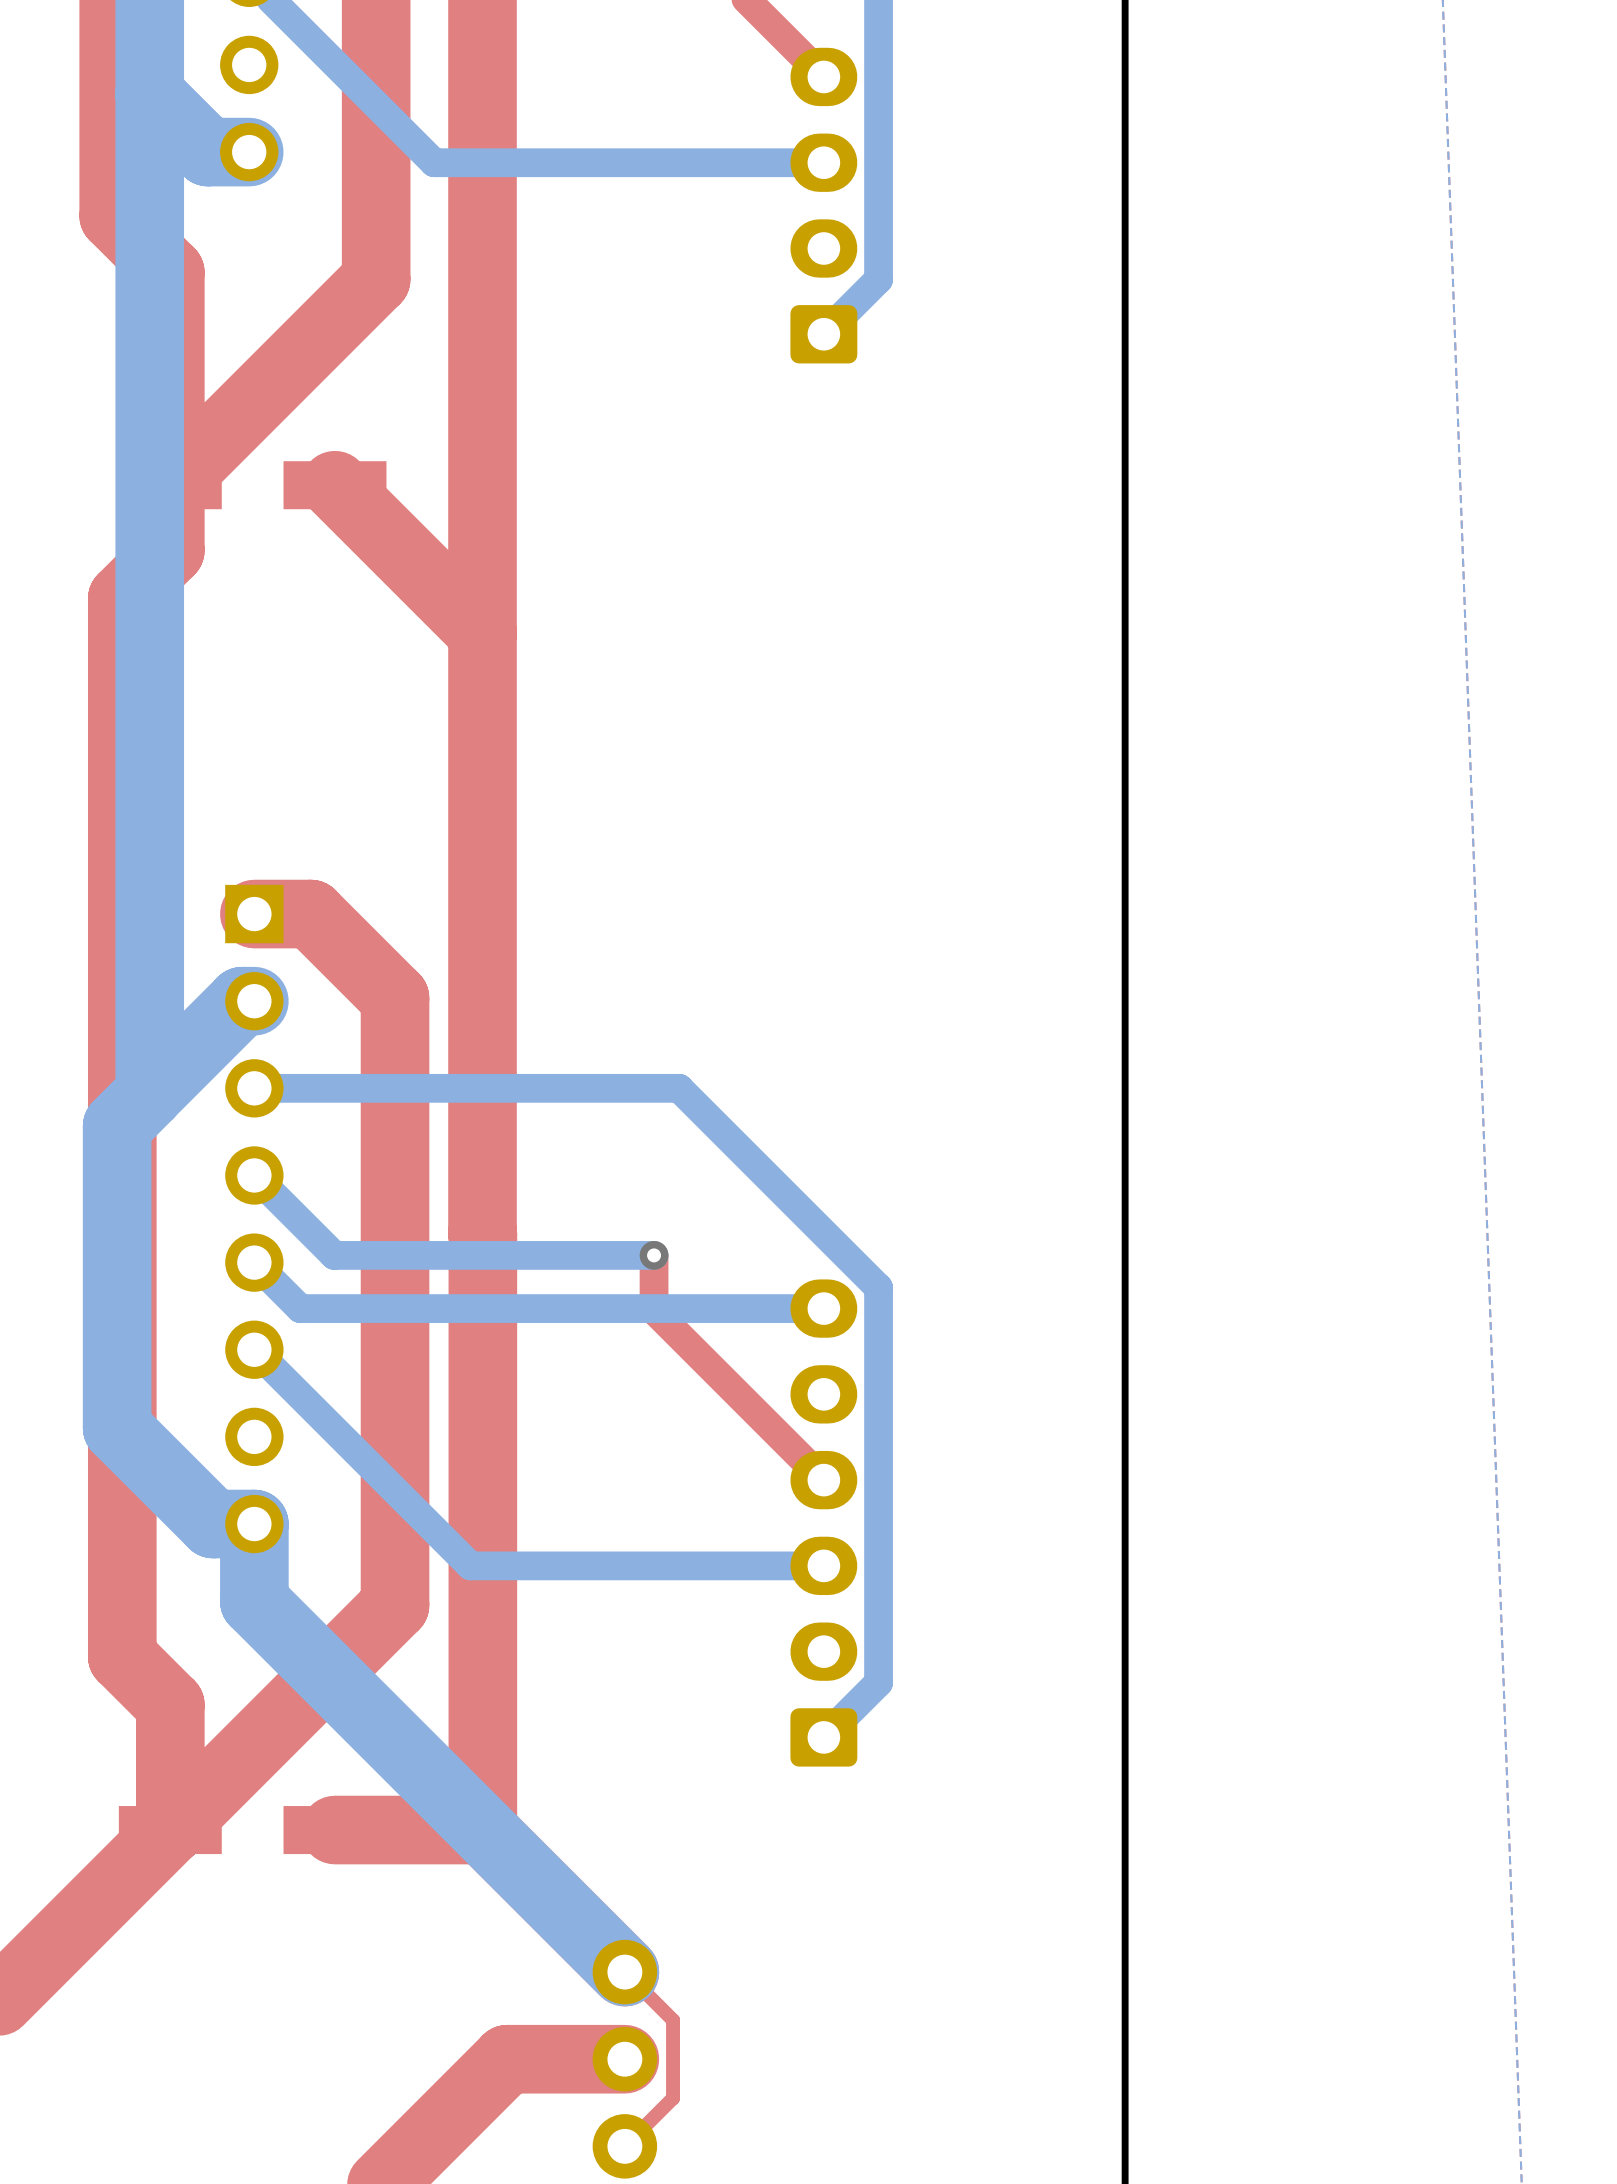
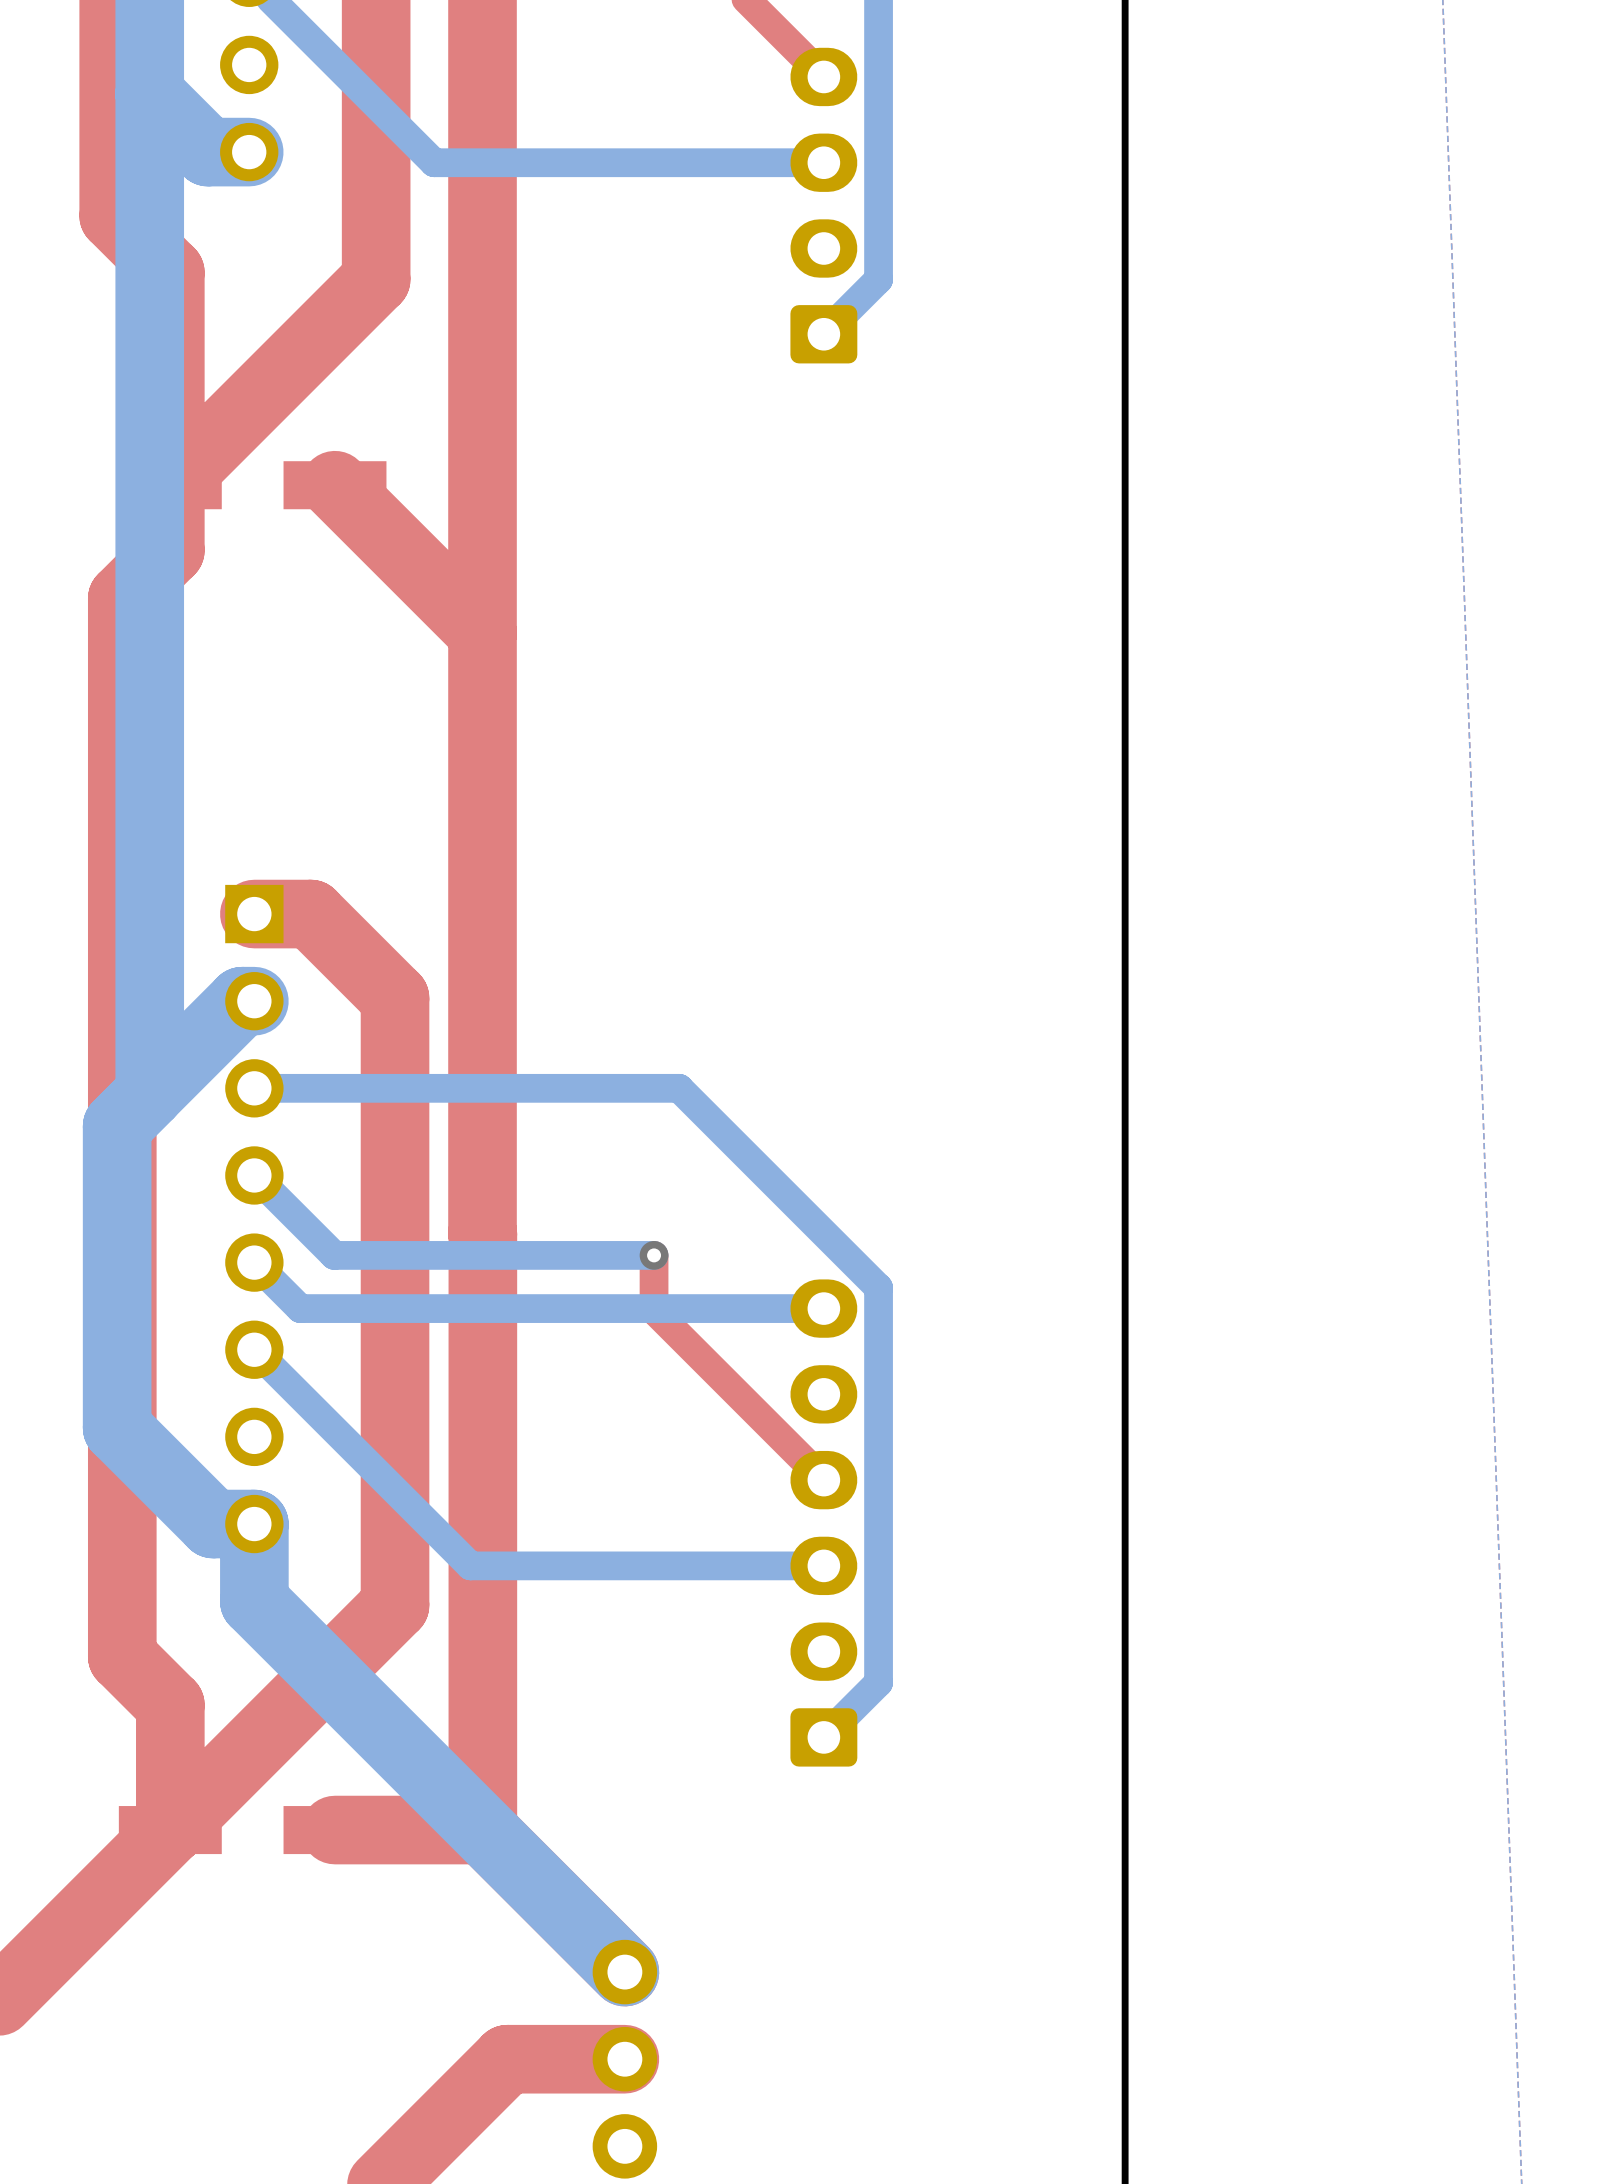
top track: (624, 1972) (673, 2020) (673, 2098) (624, 2146) -> none

